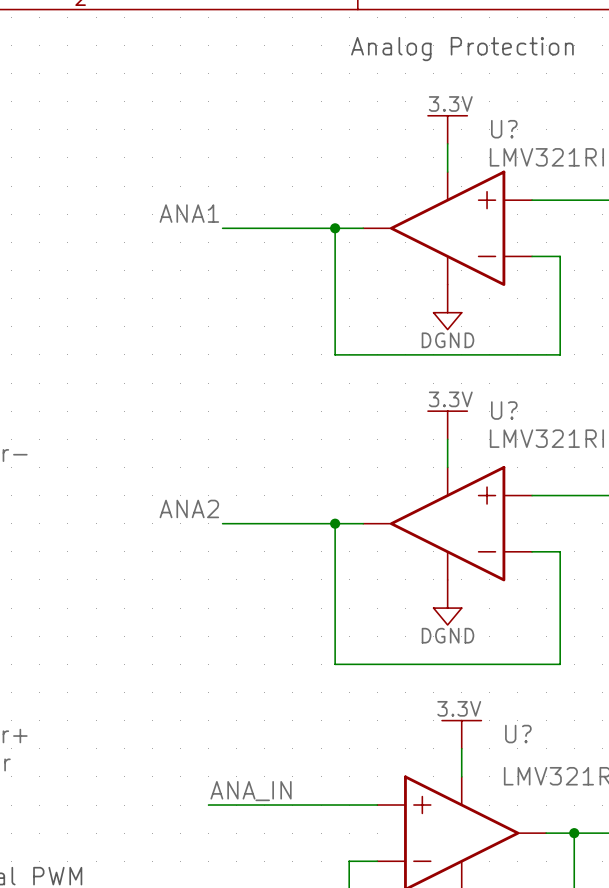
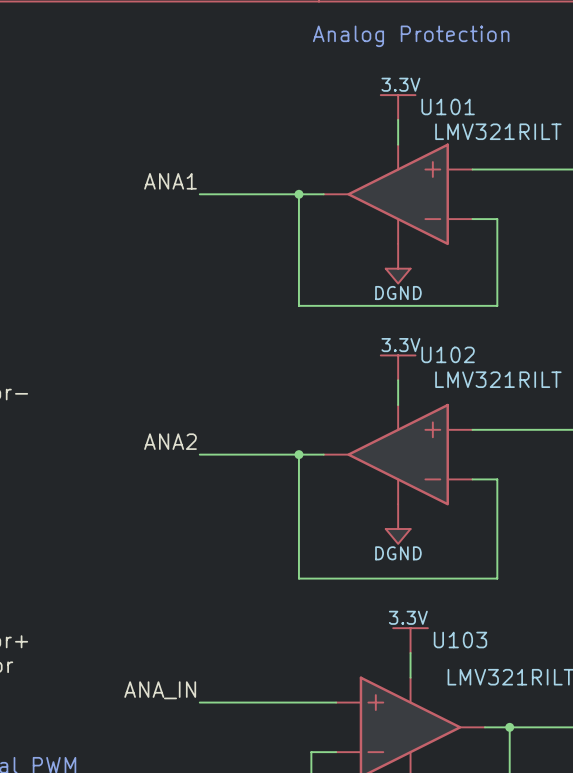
U? name: U? (504, 129) -> U101 (448, 106)
U? name: U? (504, 410) -> U102 (448, 354)
U? name: U? (518, 734) -> U103 (460, 640)
label position: ANA_IN (251, 791) -> ANA_IN (160, 690)
wire: (208, 805) (222, 805) -> none

